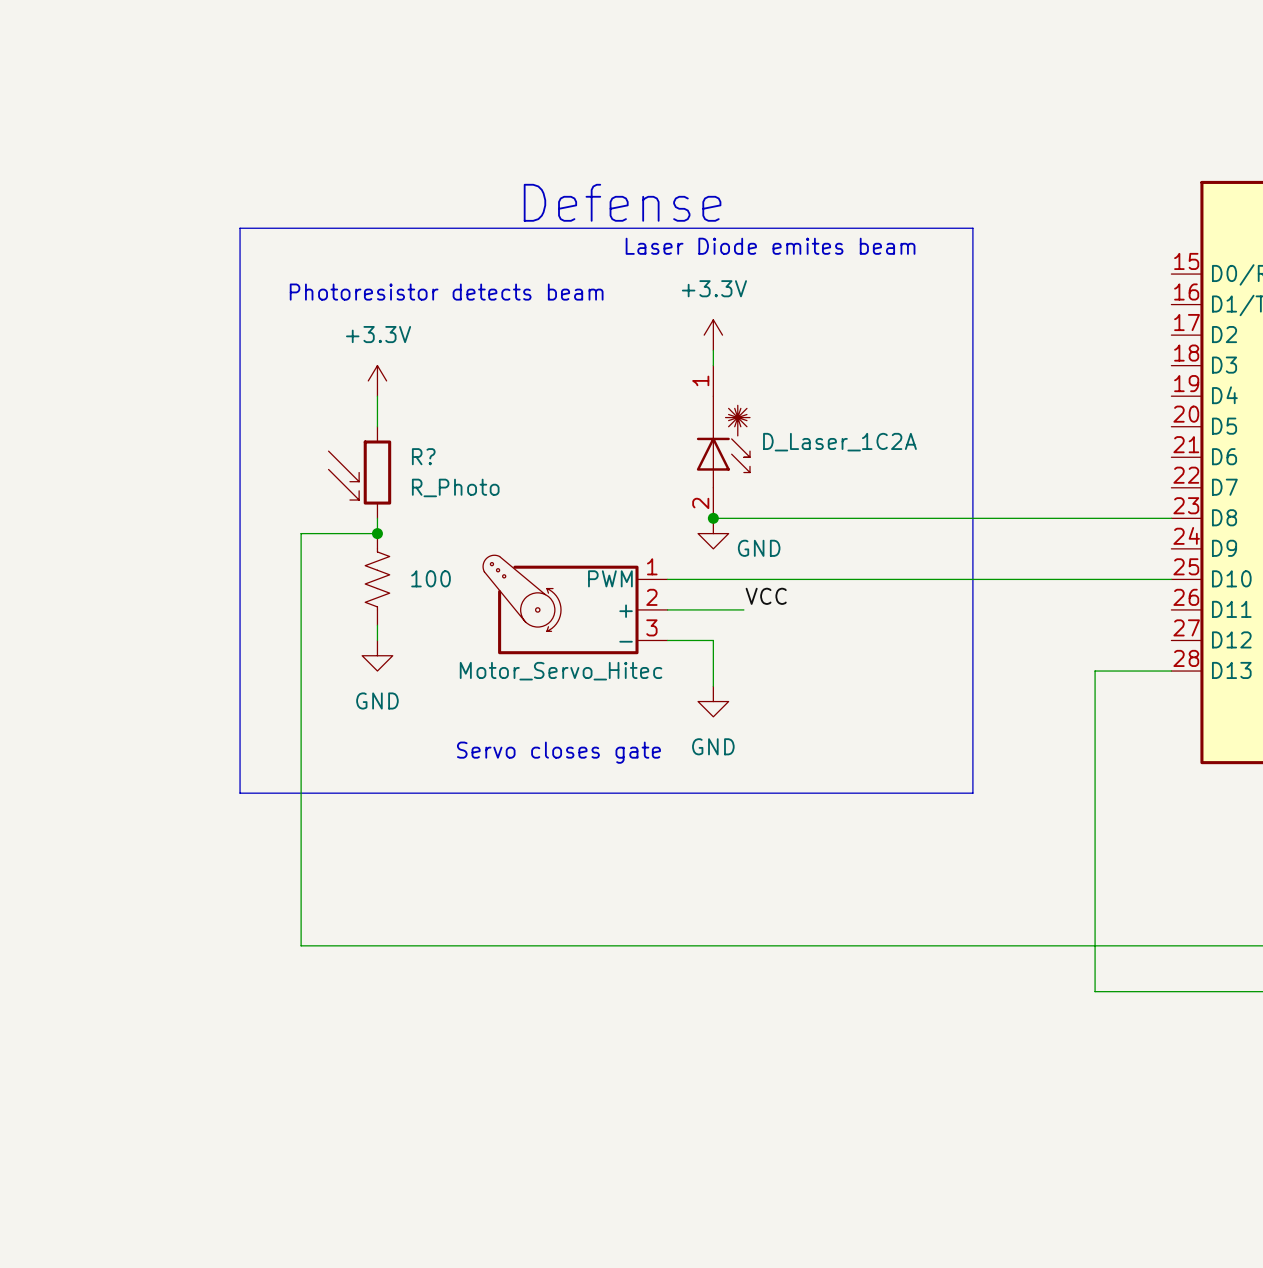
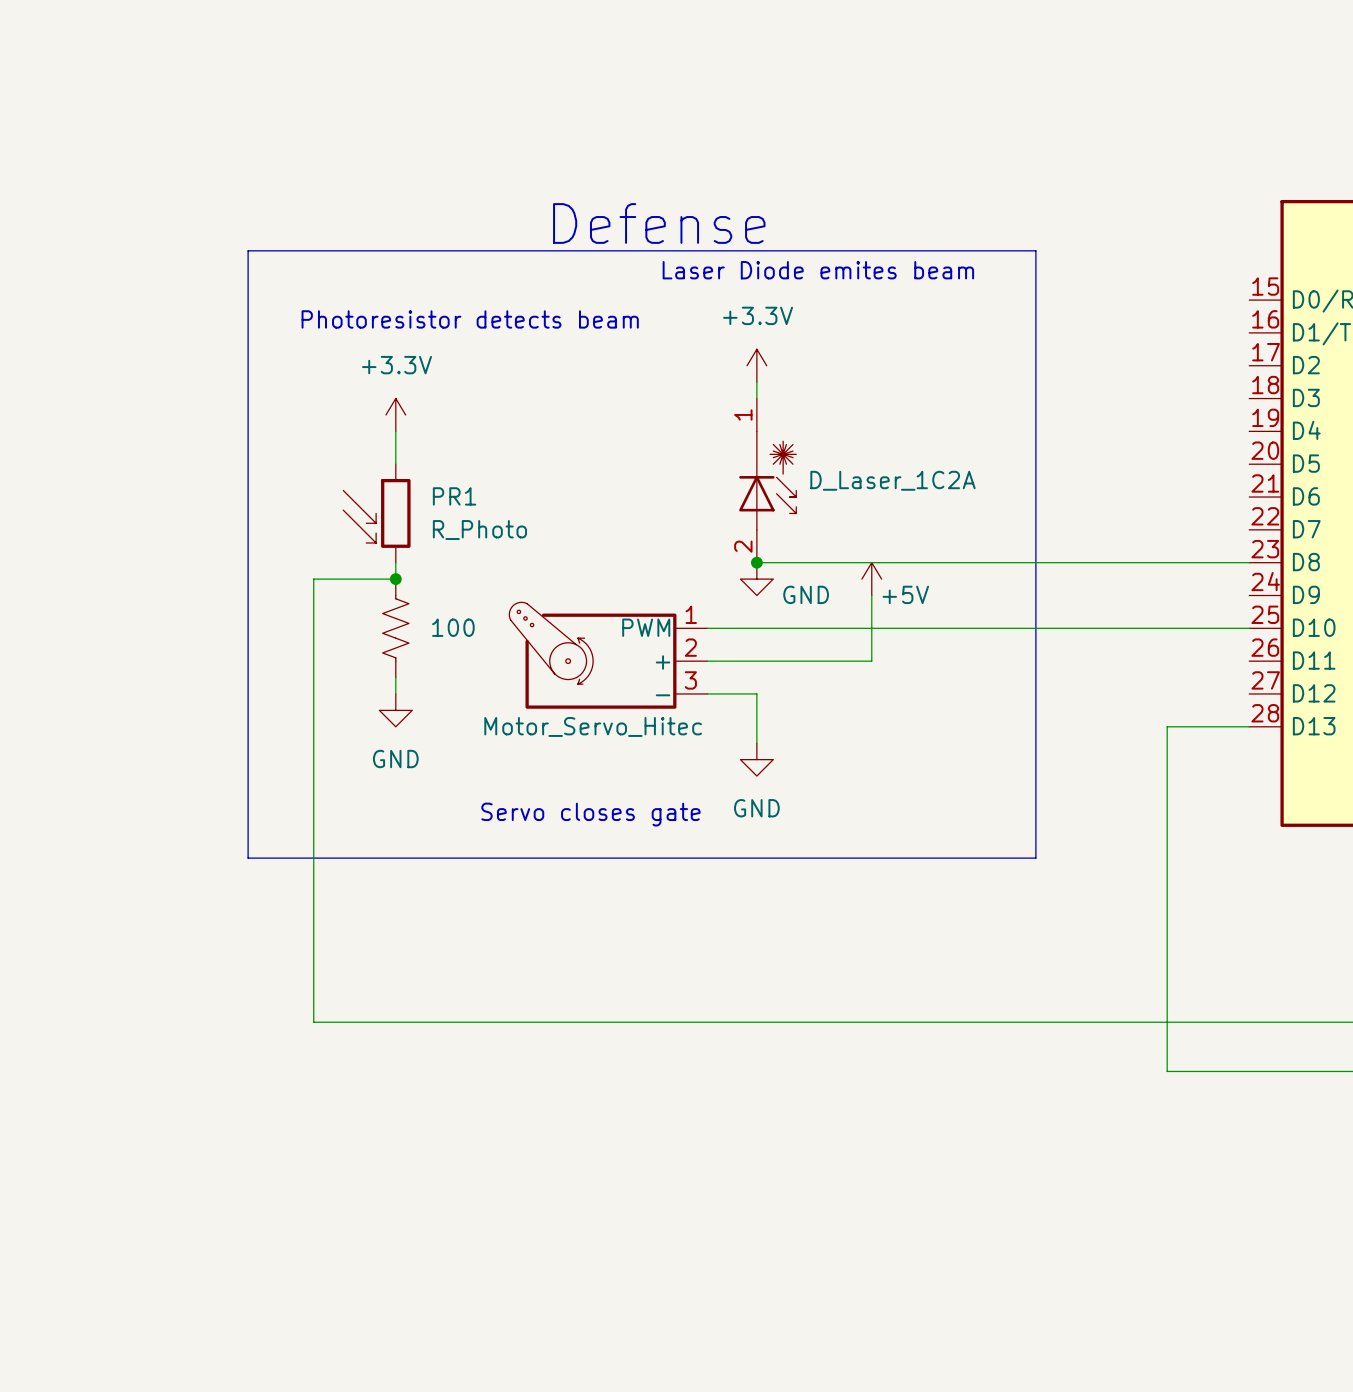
R? name: R? (423, 456) -> PR1 (454, 496)
power symbol: none -> +5V (871, 579)
wire: none -> (871, 595) (871, 661) (789, 661)
label: VCC (766, 596) -> none

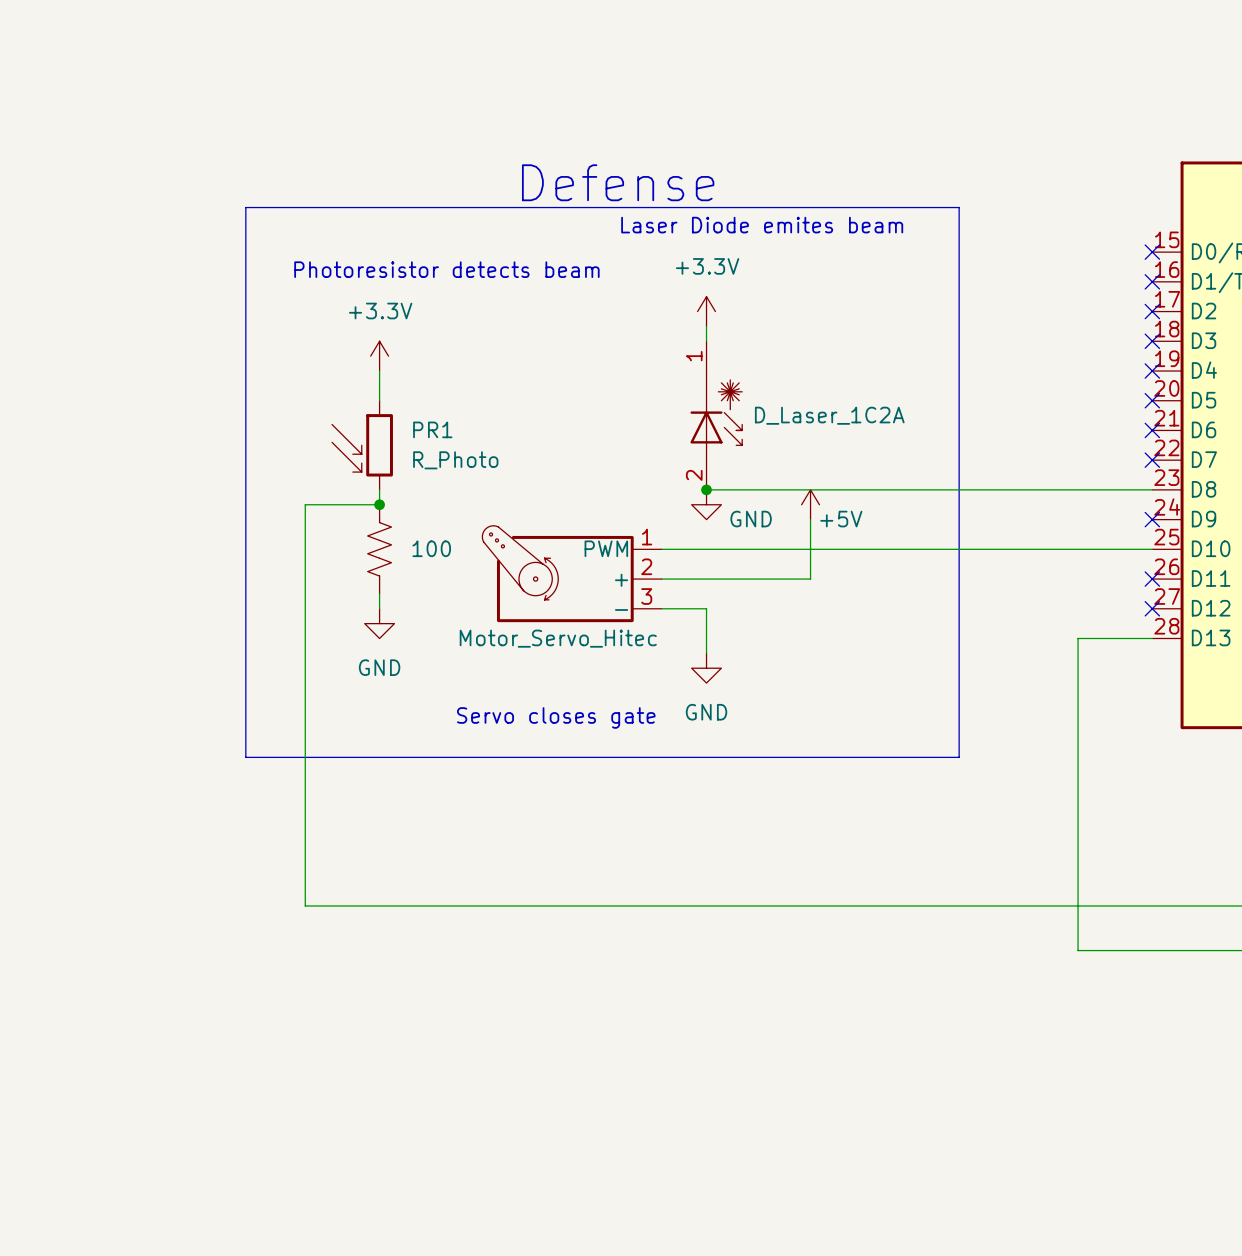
no-connect mark: none -> (1152, 252)
no-connect mark: none -> (1152, 281)
no-connect mark: none -> (1152, 311)
no-connect mark: none -> (1152, 341)
no-connect mark: none -> (1152, 371)
no-connect mark: none -> (1152, 400)
no-connect mark: none -> (1152, 430)
no-connect mark: none -> (1152, 460)
no-connect mark: none -> (1152, 519)
no-connect mark: none -> (1152, 579)
no-connect mark: none -> (1152, 608)

